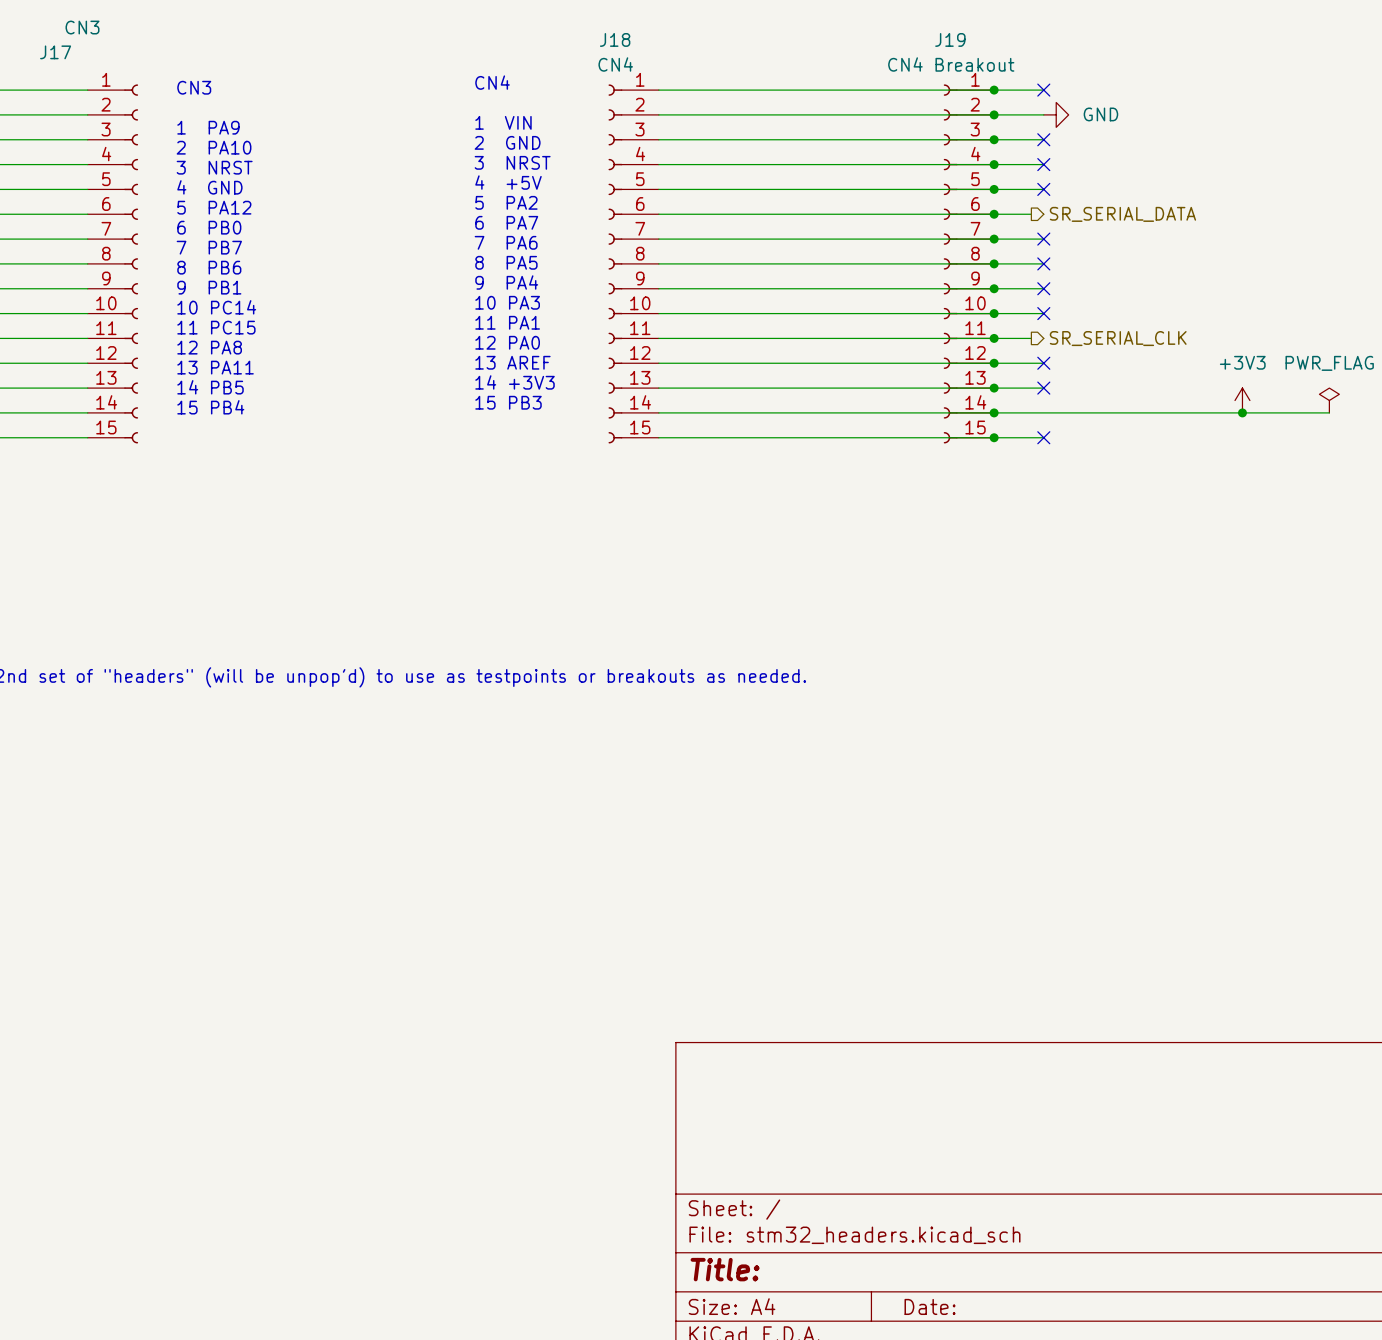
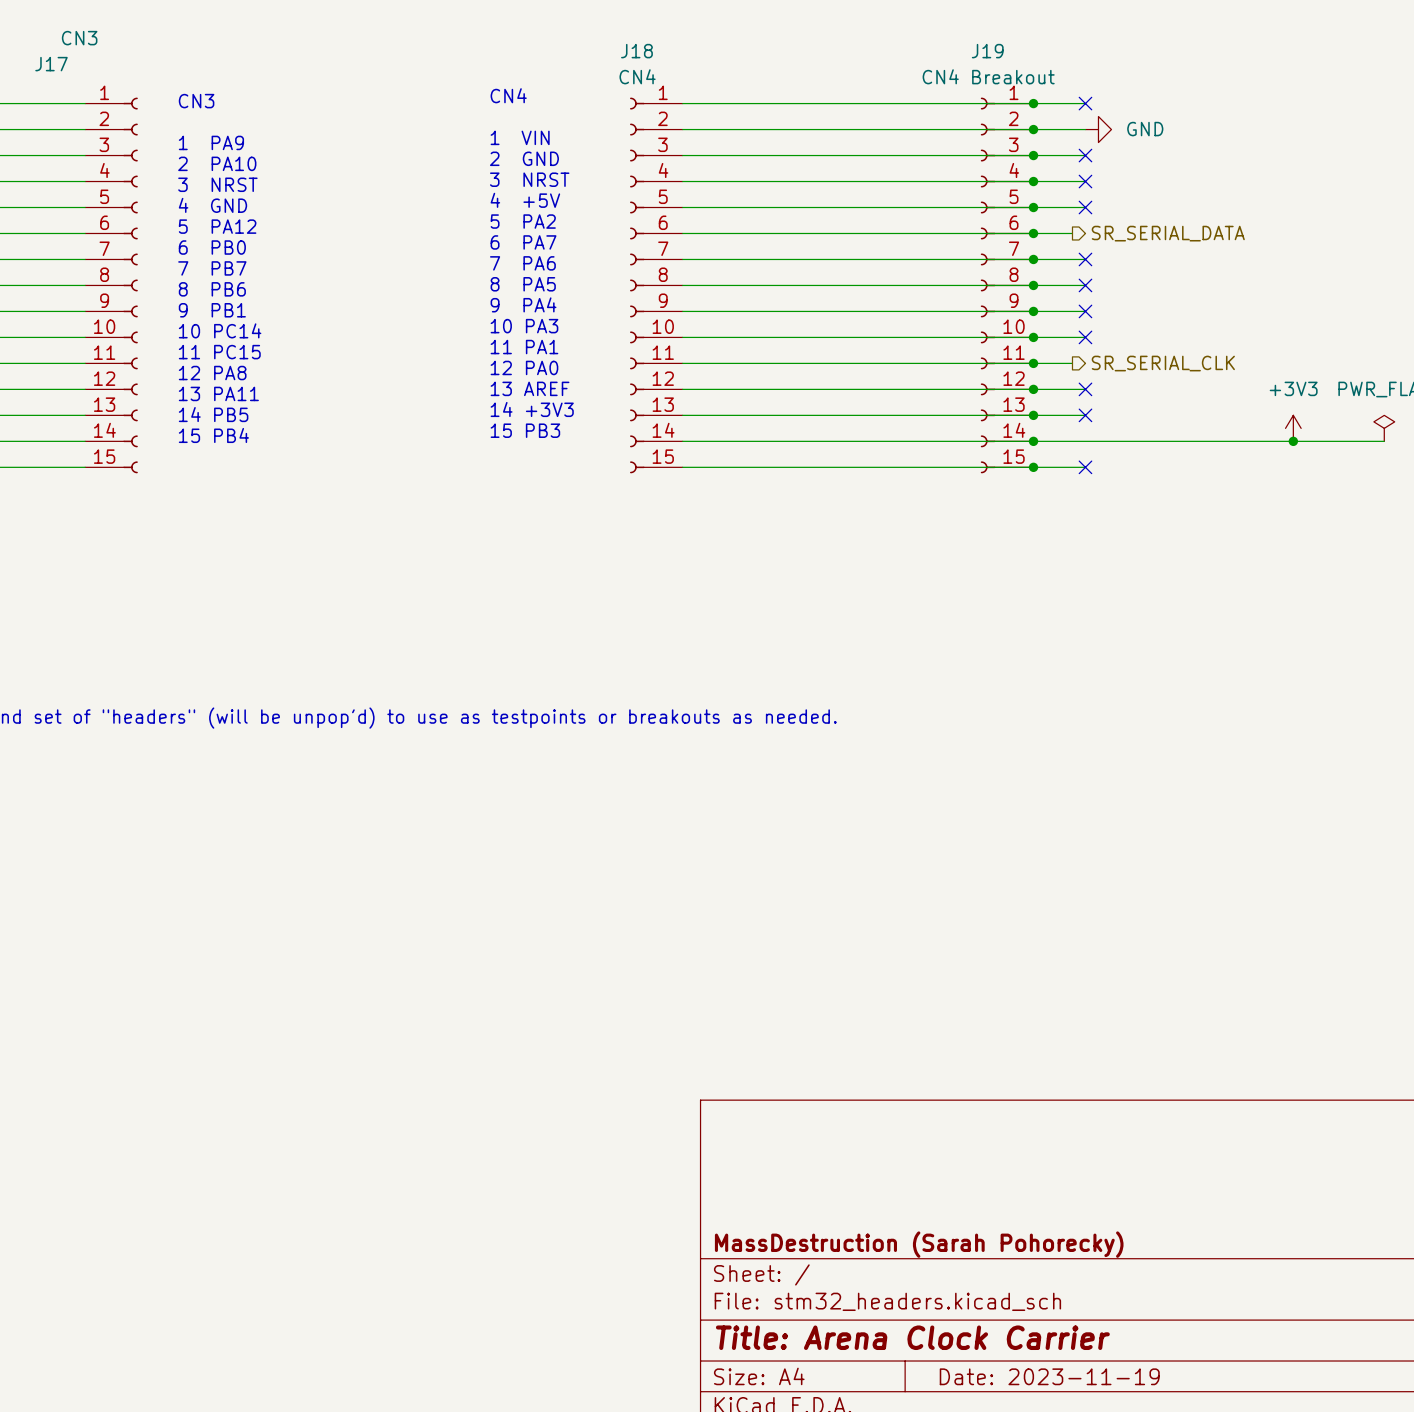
title block: none -> MassDestruction (Sarah Pohorecky) (919, 1244)
title block: Title: (725, 1269) -> Title: Arena Clock Carrier (912, 1337)
title block: Date: (930, 1306) -> Date: 2023-11-19 (1049, 1376)

